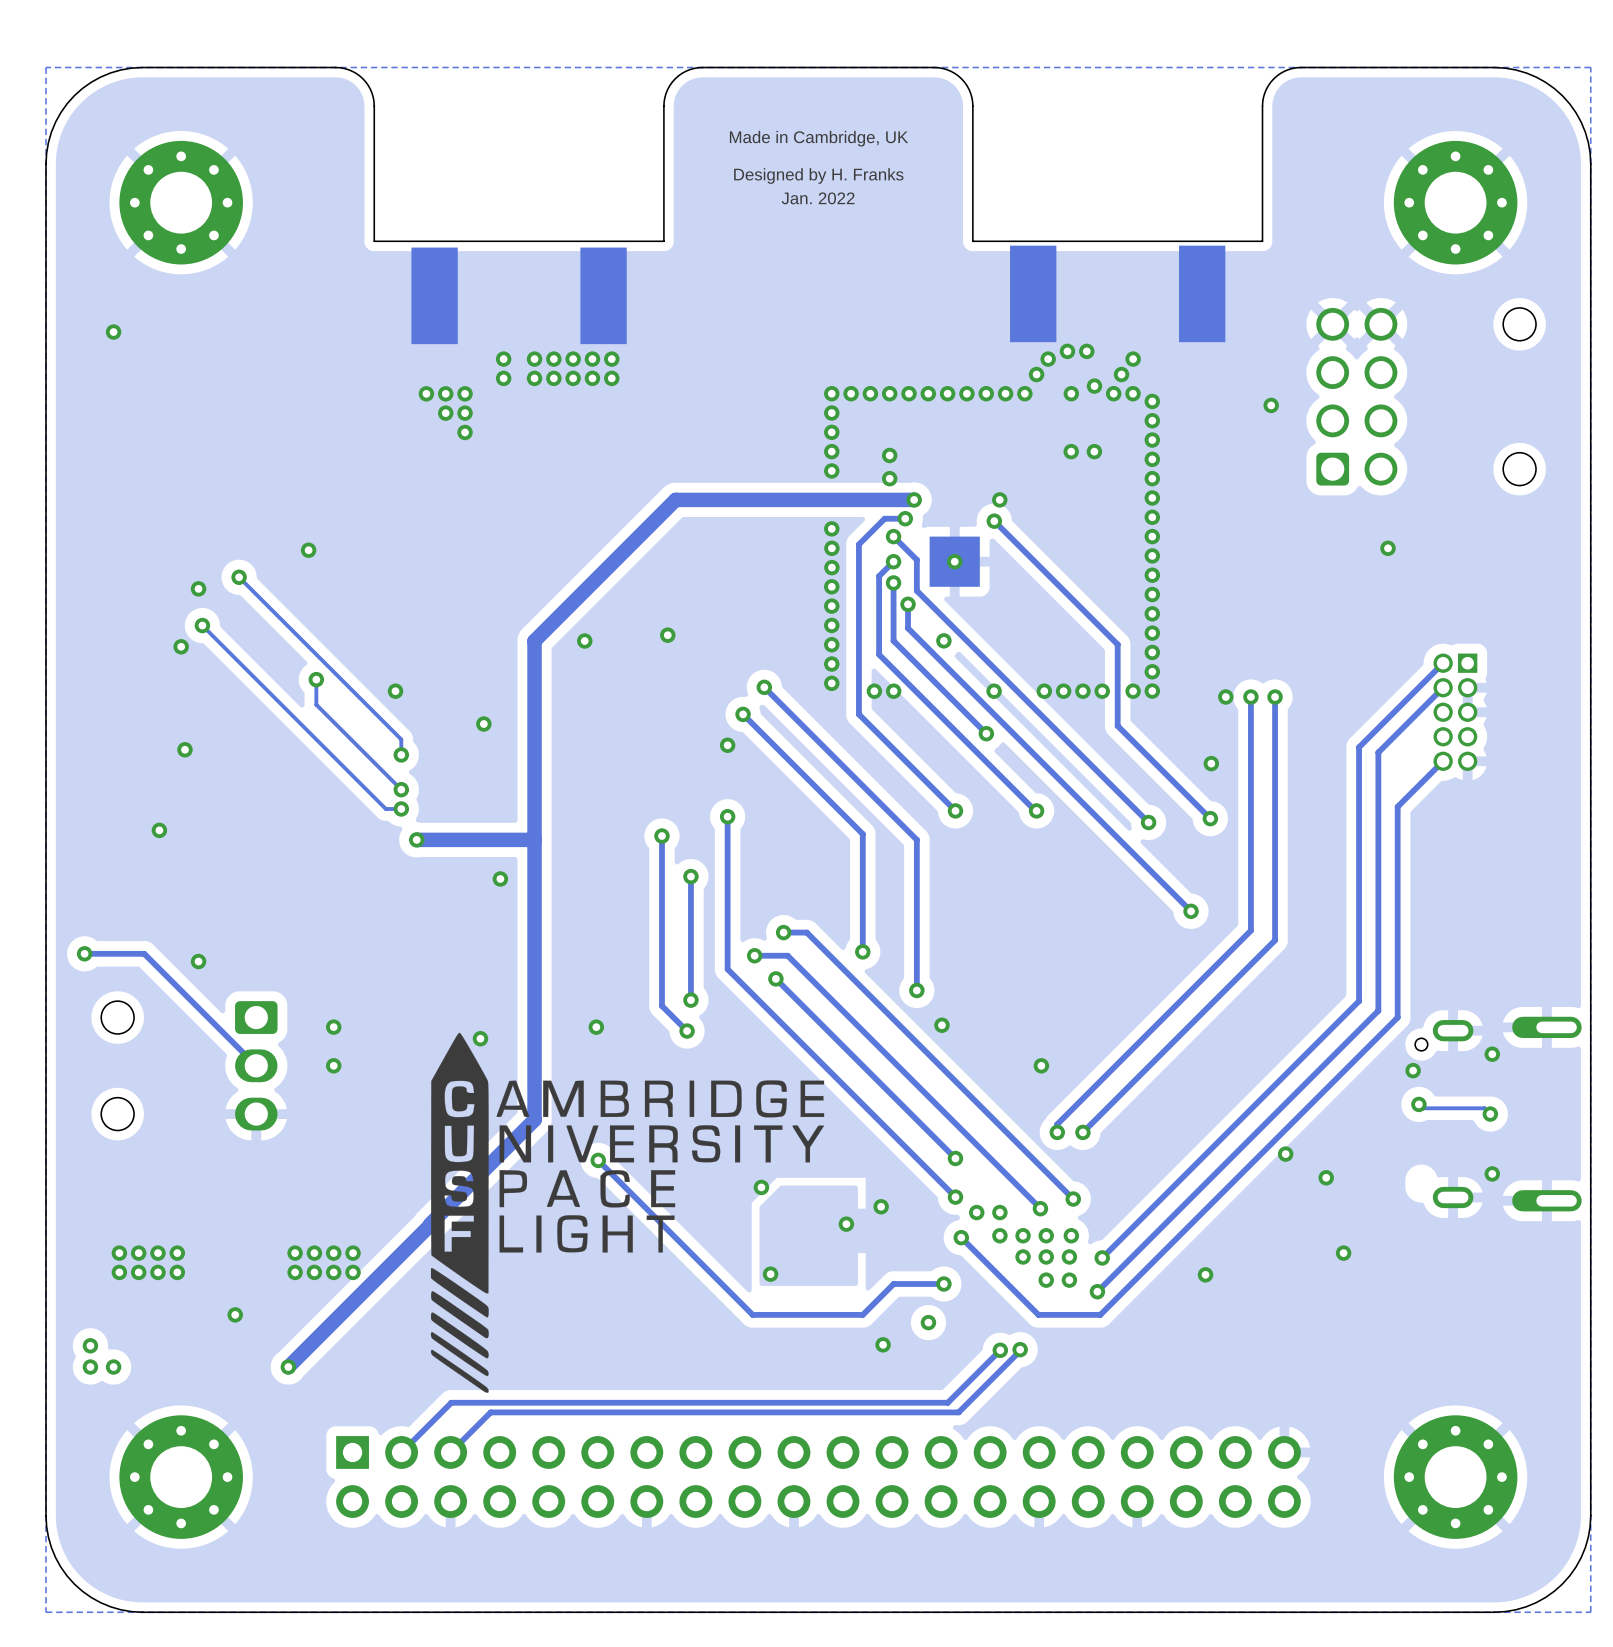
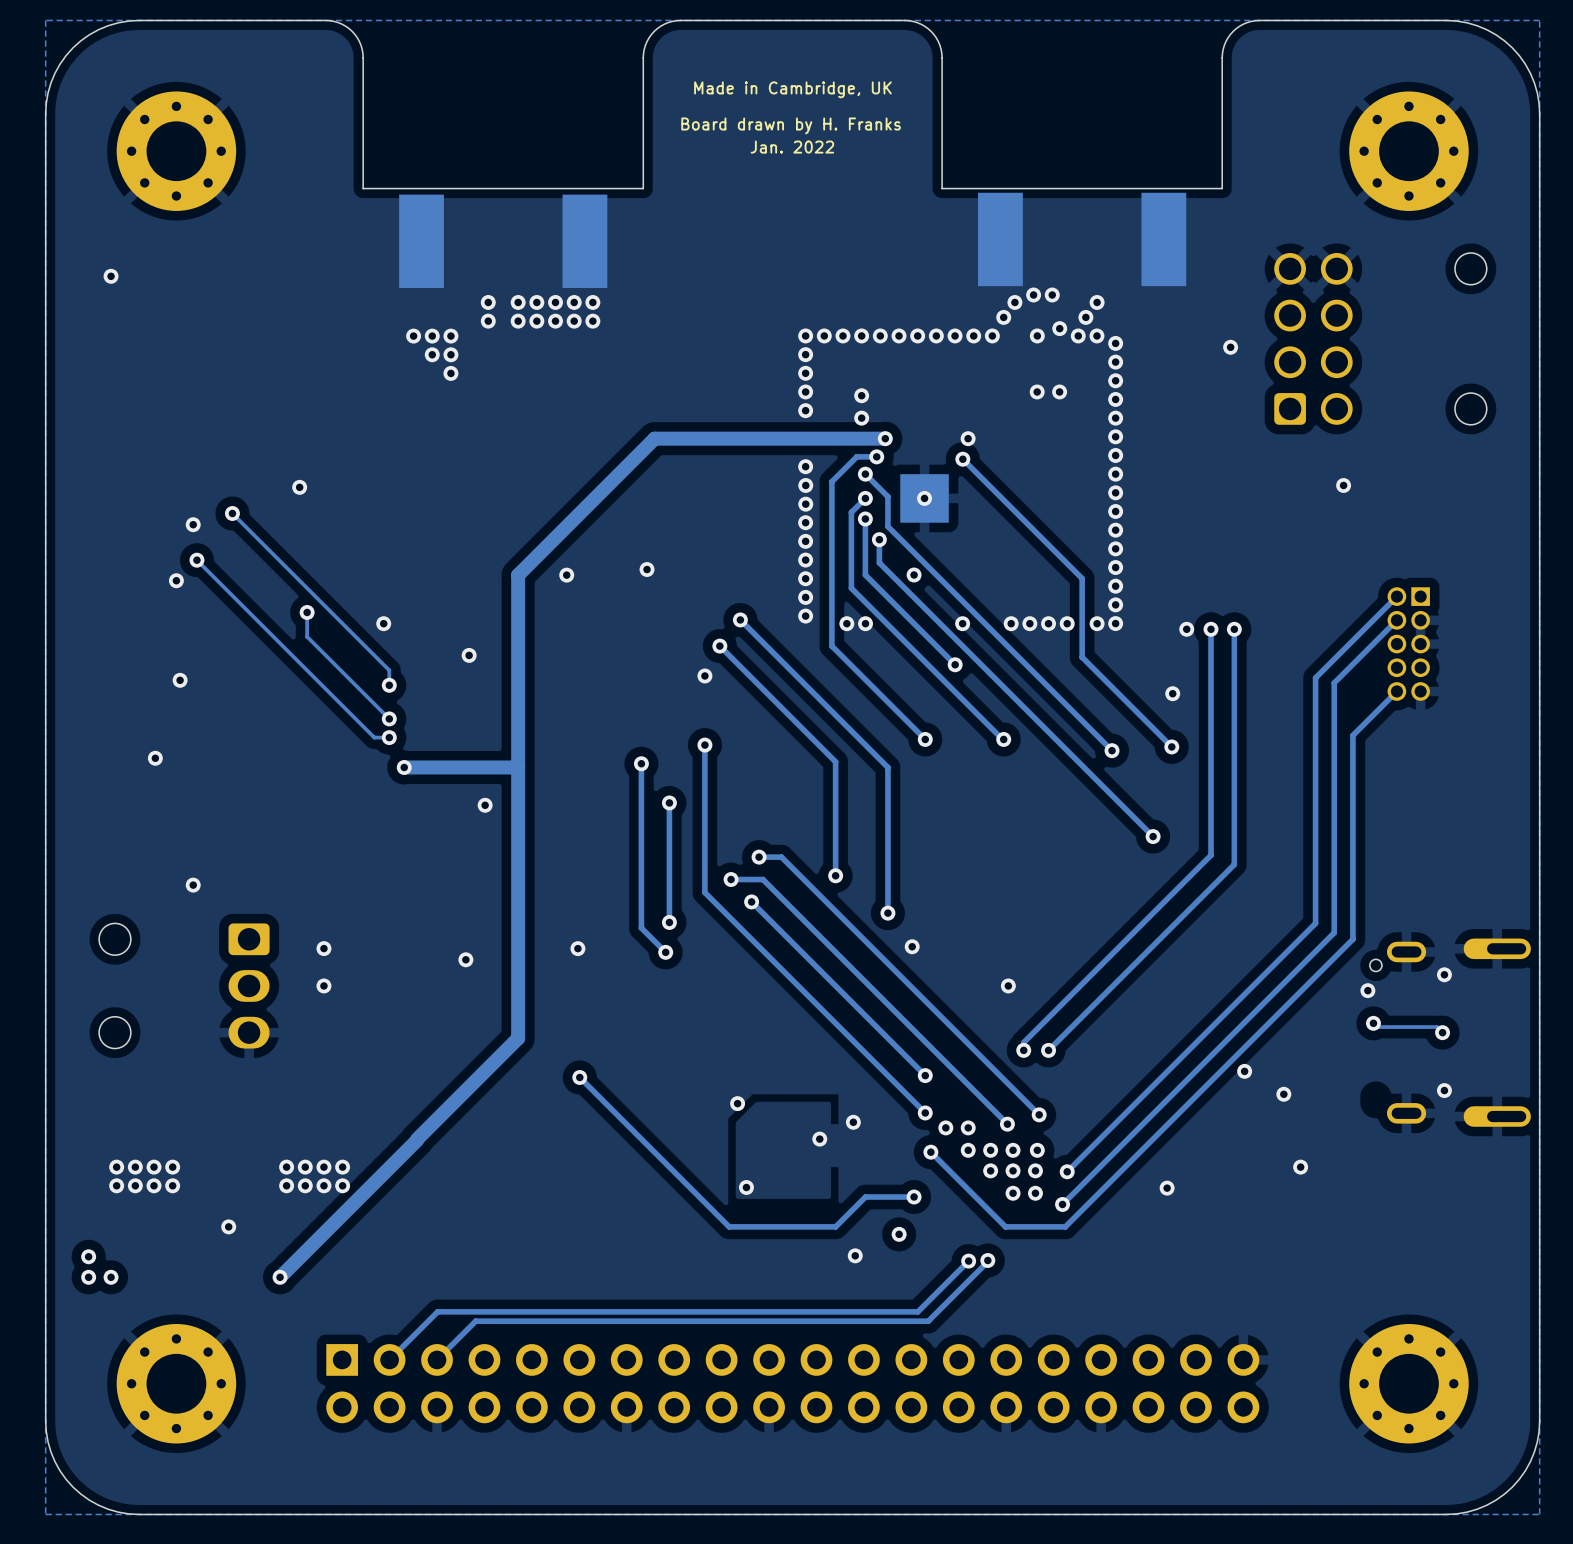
text: Designed by H. Franks (818, 175) -> Board drawn by H. Franks (791, 125)
track: (84, 953) (144, 953) (256, 1065) -> none
via: (84, 953) -> none
drawing: [430, 1032, 825, 1393] -> none

